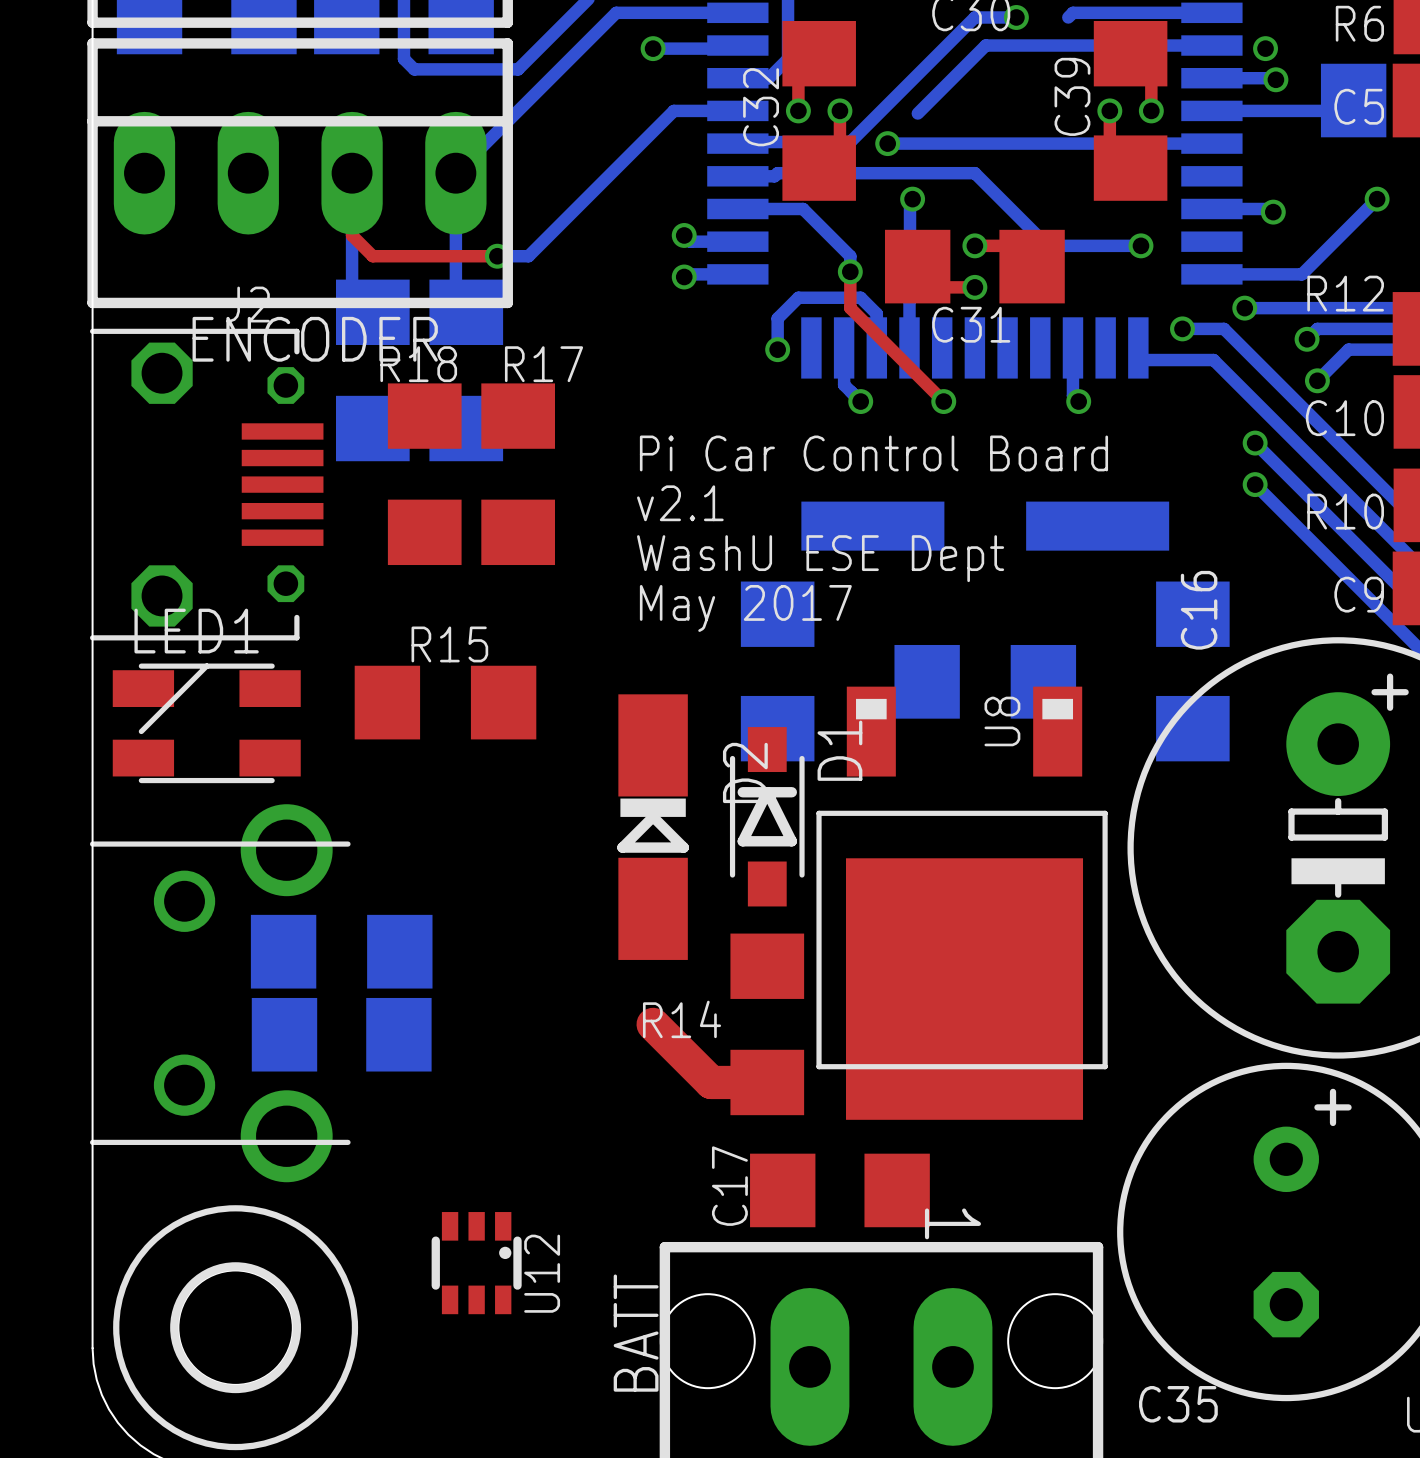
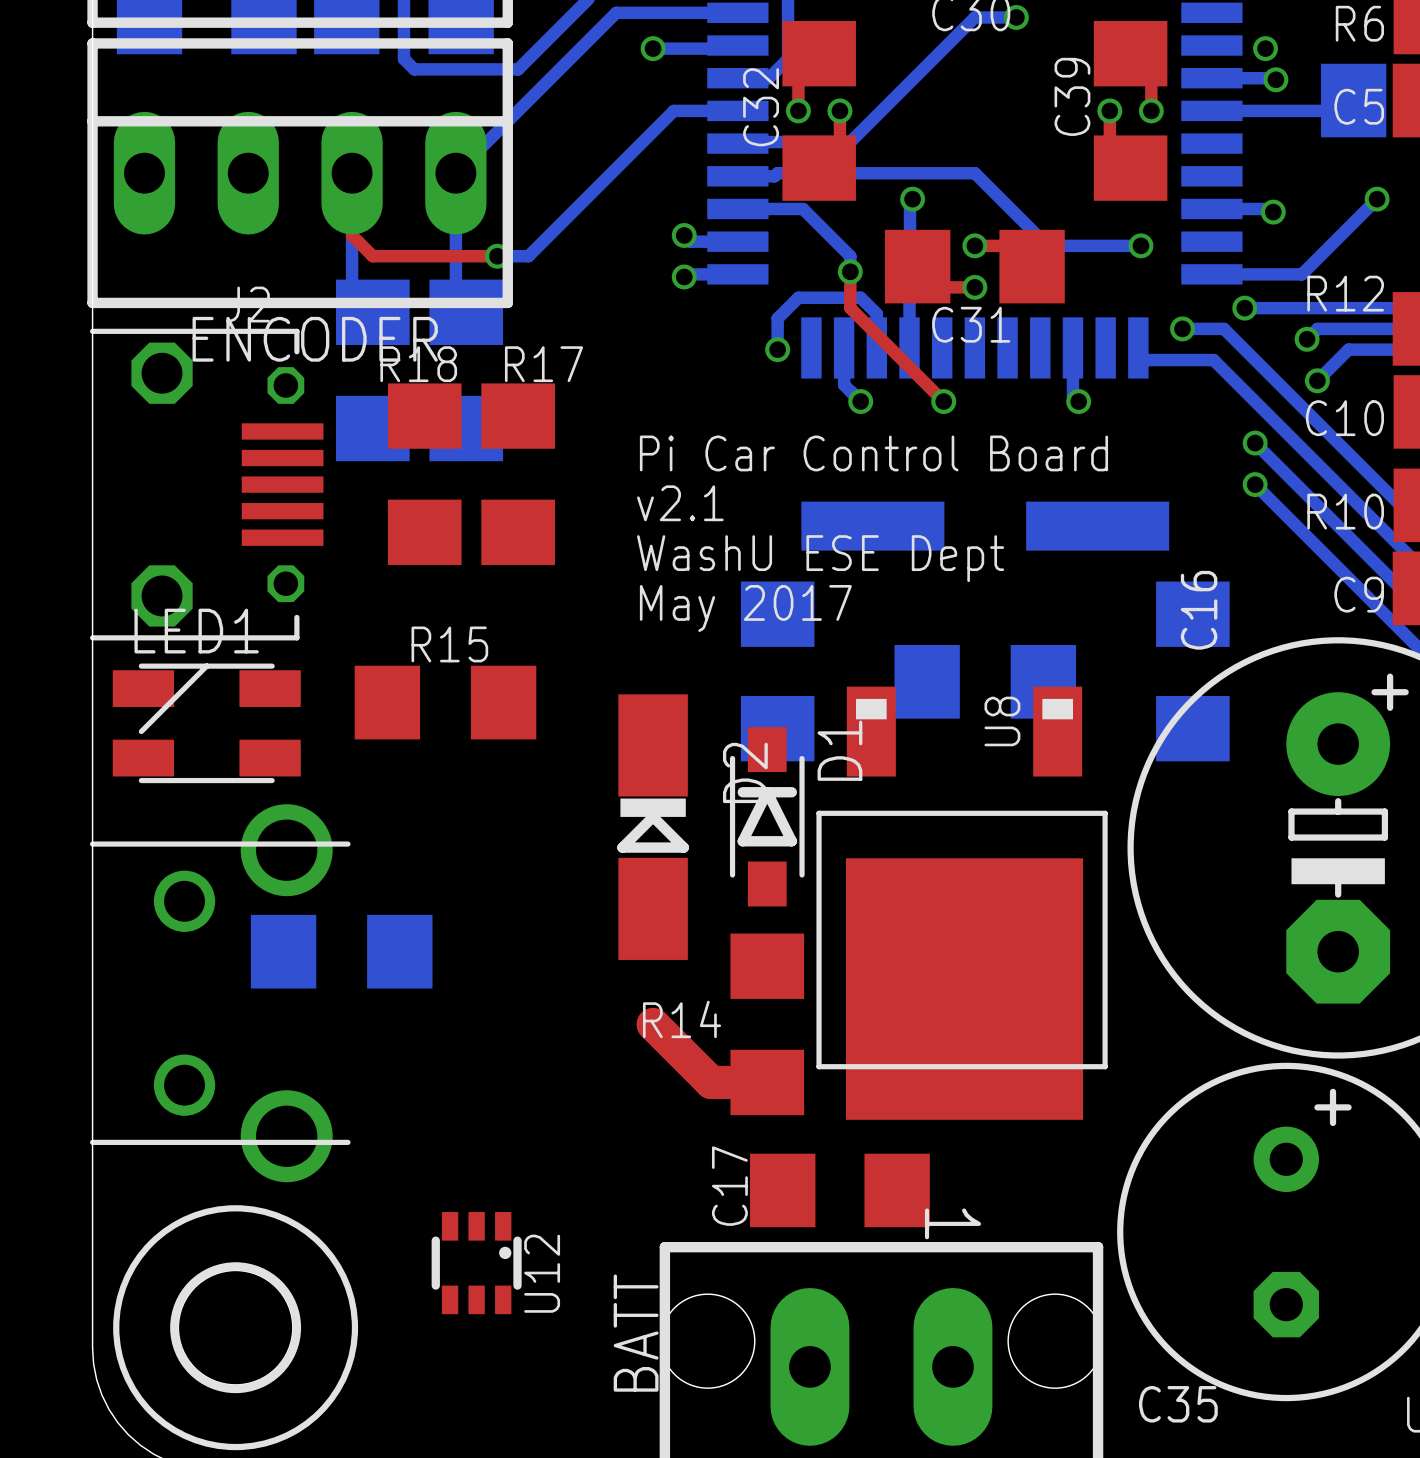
bottom track: (1211, 12) (1072, 12) (1068, 17) -> none
bottom track: (1211, 45) (985, 45) (917, 113) -> none
bottom track: (887, 143) (1211, 143) -> none
via: (887, 143) -> none
part: (341, 1034) -> none

